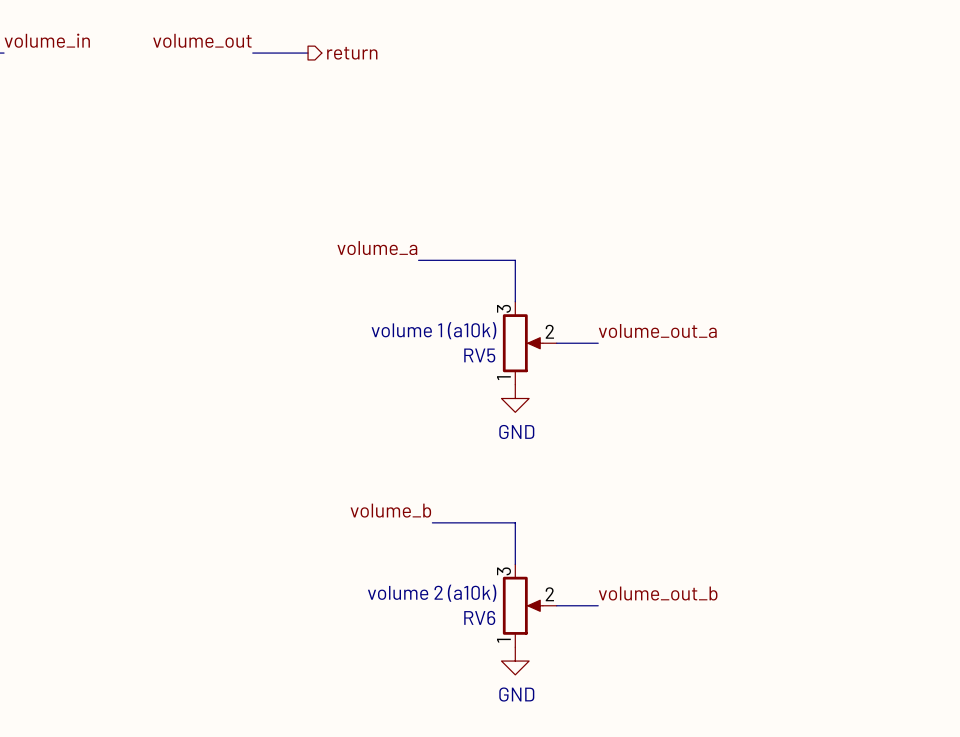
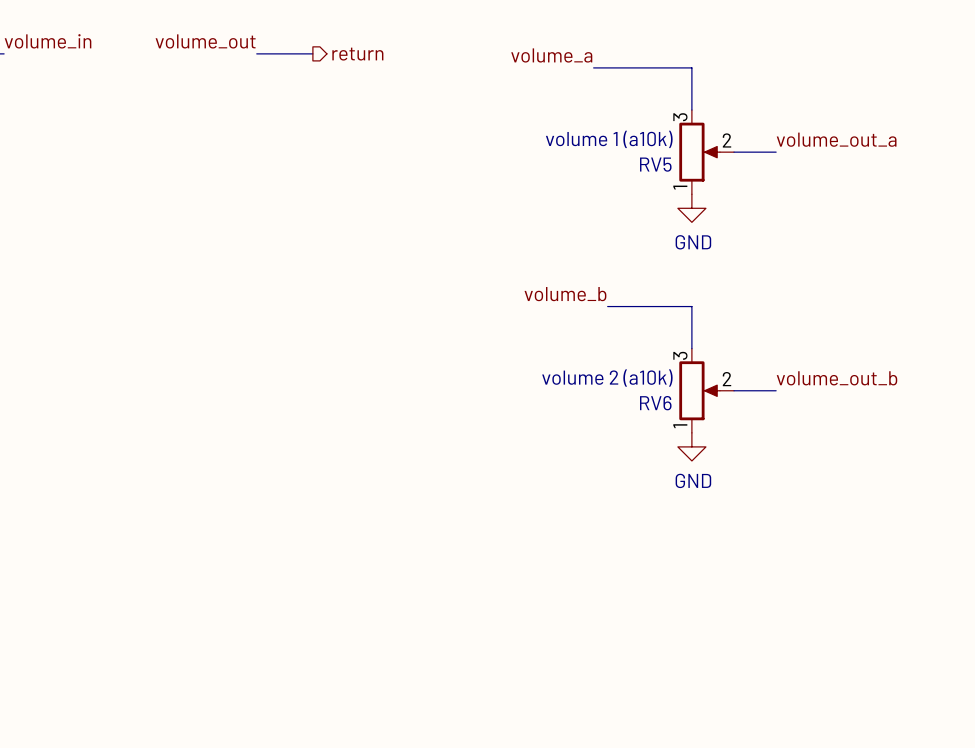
power symbol: none -> GND (691, 208)
label position: volume_a (377, 248) -> volume_a (551, 55)
wire: (418, 260) (515, 260) (515, 301) -> (593, 67) (691, 67) (691, 110)
label: none -> volume_b (565, 294)
wire: none -> (607, 306) (691, 306) (691, 348)
label position: volume_out_a (657, 330) -> volume_out_a (836, 139)
RV5 position: (529, 343) -> (706, 152)
wire: (556, 343) (598, 343) -> (734, 152) (776, 152)
label: none -> volume_out_b (837, 378)
wire: none -> (734, 390) (776, 390)
power symbol: GND (515, 398) -> none
power symbol: none -> GND (691, 446)
label: volume_b (390, 510) -> none
wire: (432, 522) (515, 522) (515, 564) -> none
label: volume_out_b (658, 593) -> none
RV6 position: (529, 605) -> (706, 390)
wire: (556, 605) (598, 605) -> none
power symbol: GND (515, 661) -> none

